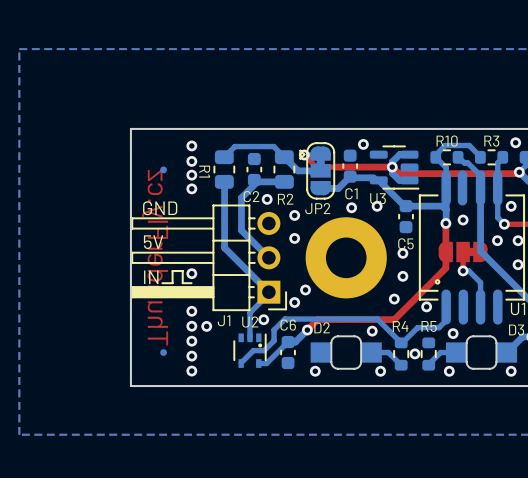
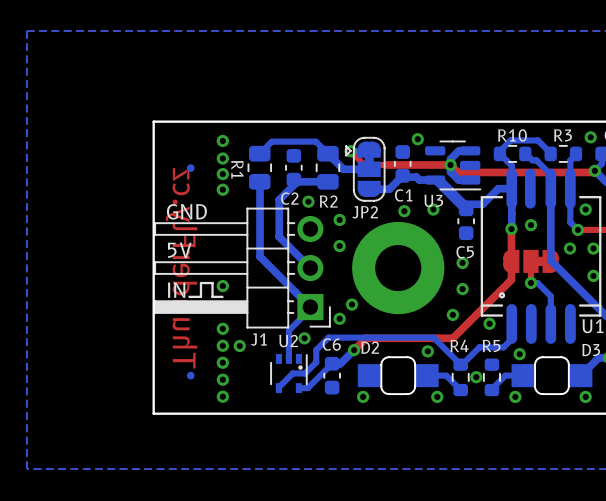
bottom track: (373, 177) (362, 177) -> (511, 188) (498, 188) (482, 204) (464, 204) (440, 180) (419, 180) (416, 177)
bottom track: (406, 206) (442, 206) (446, 209) -> none

